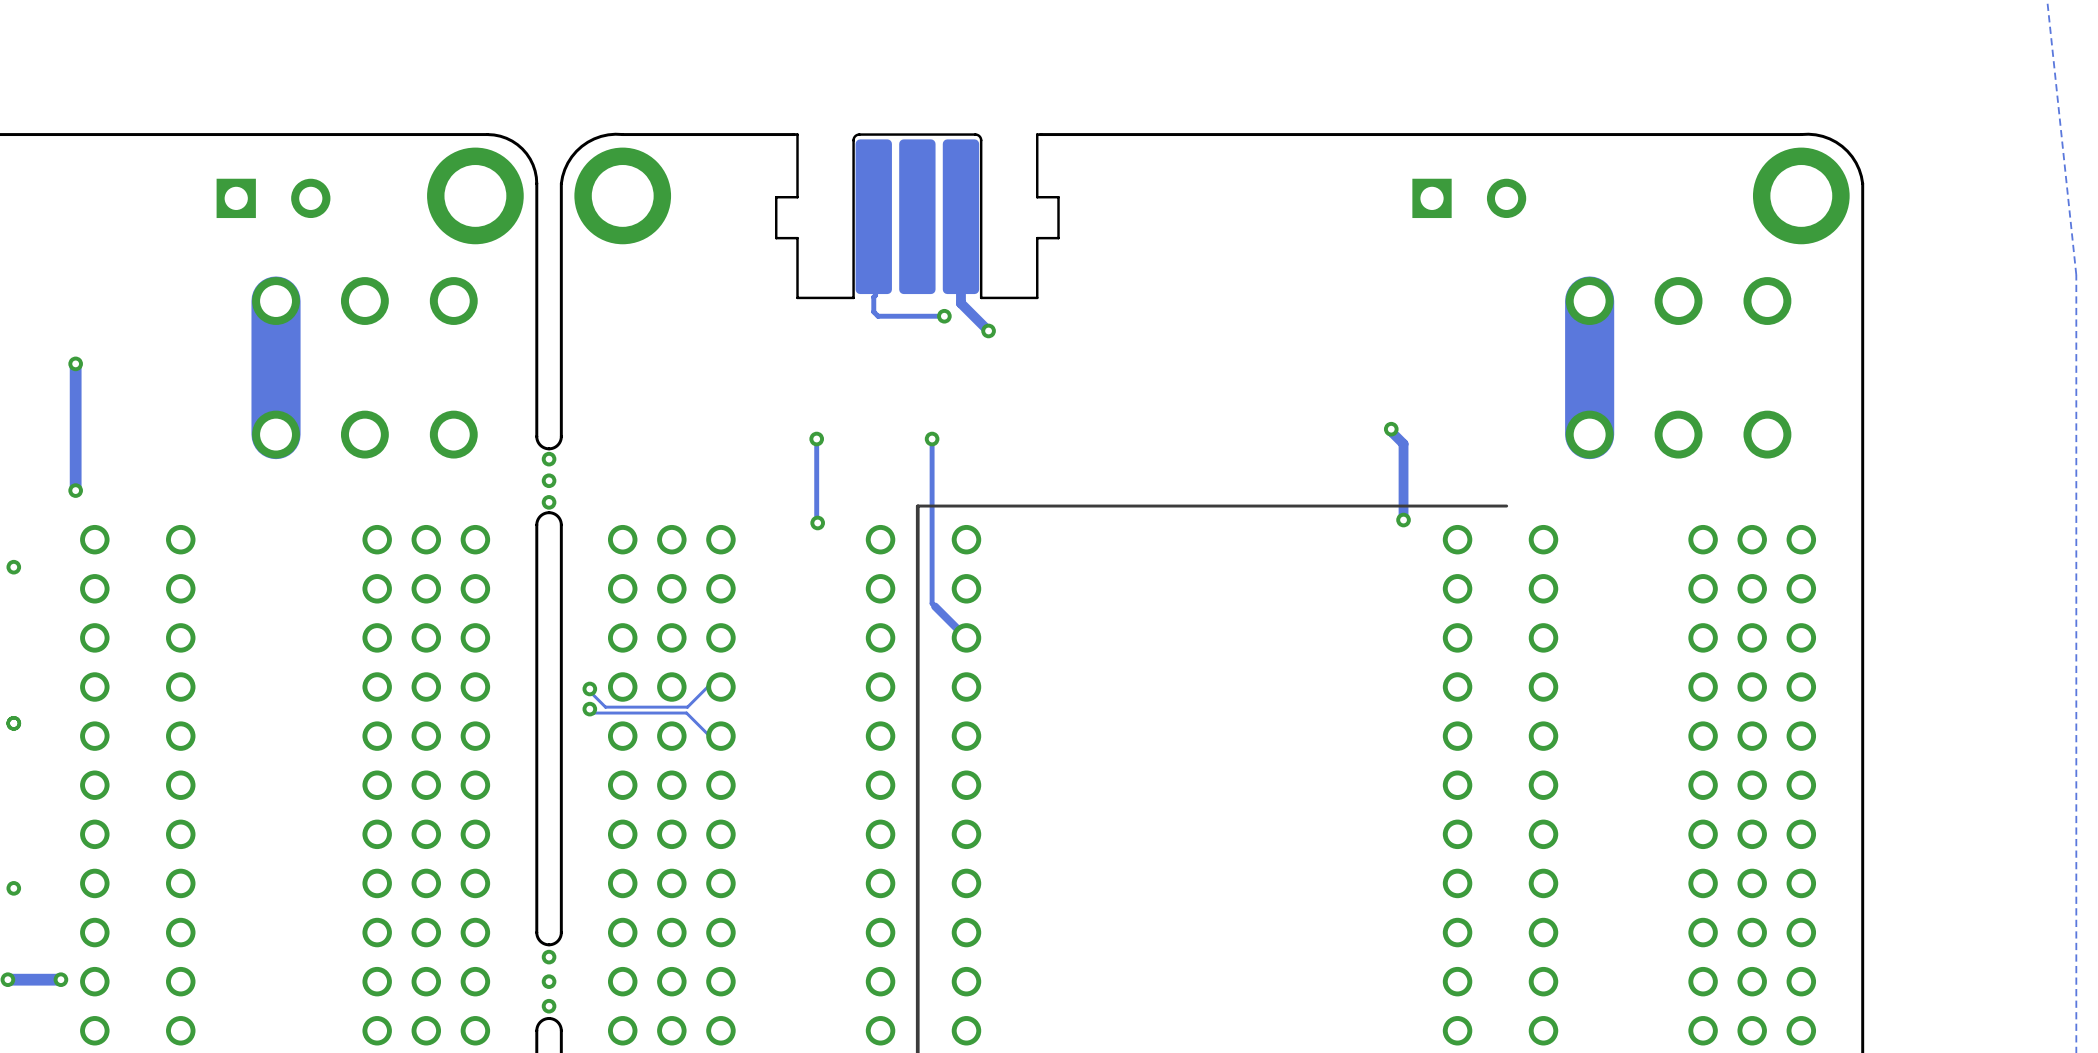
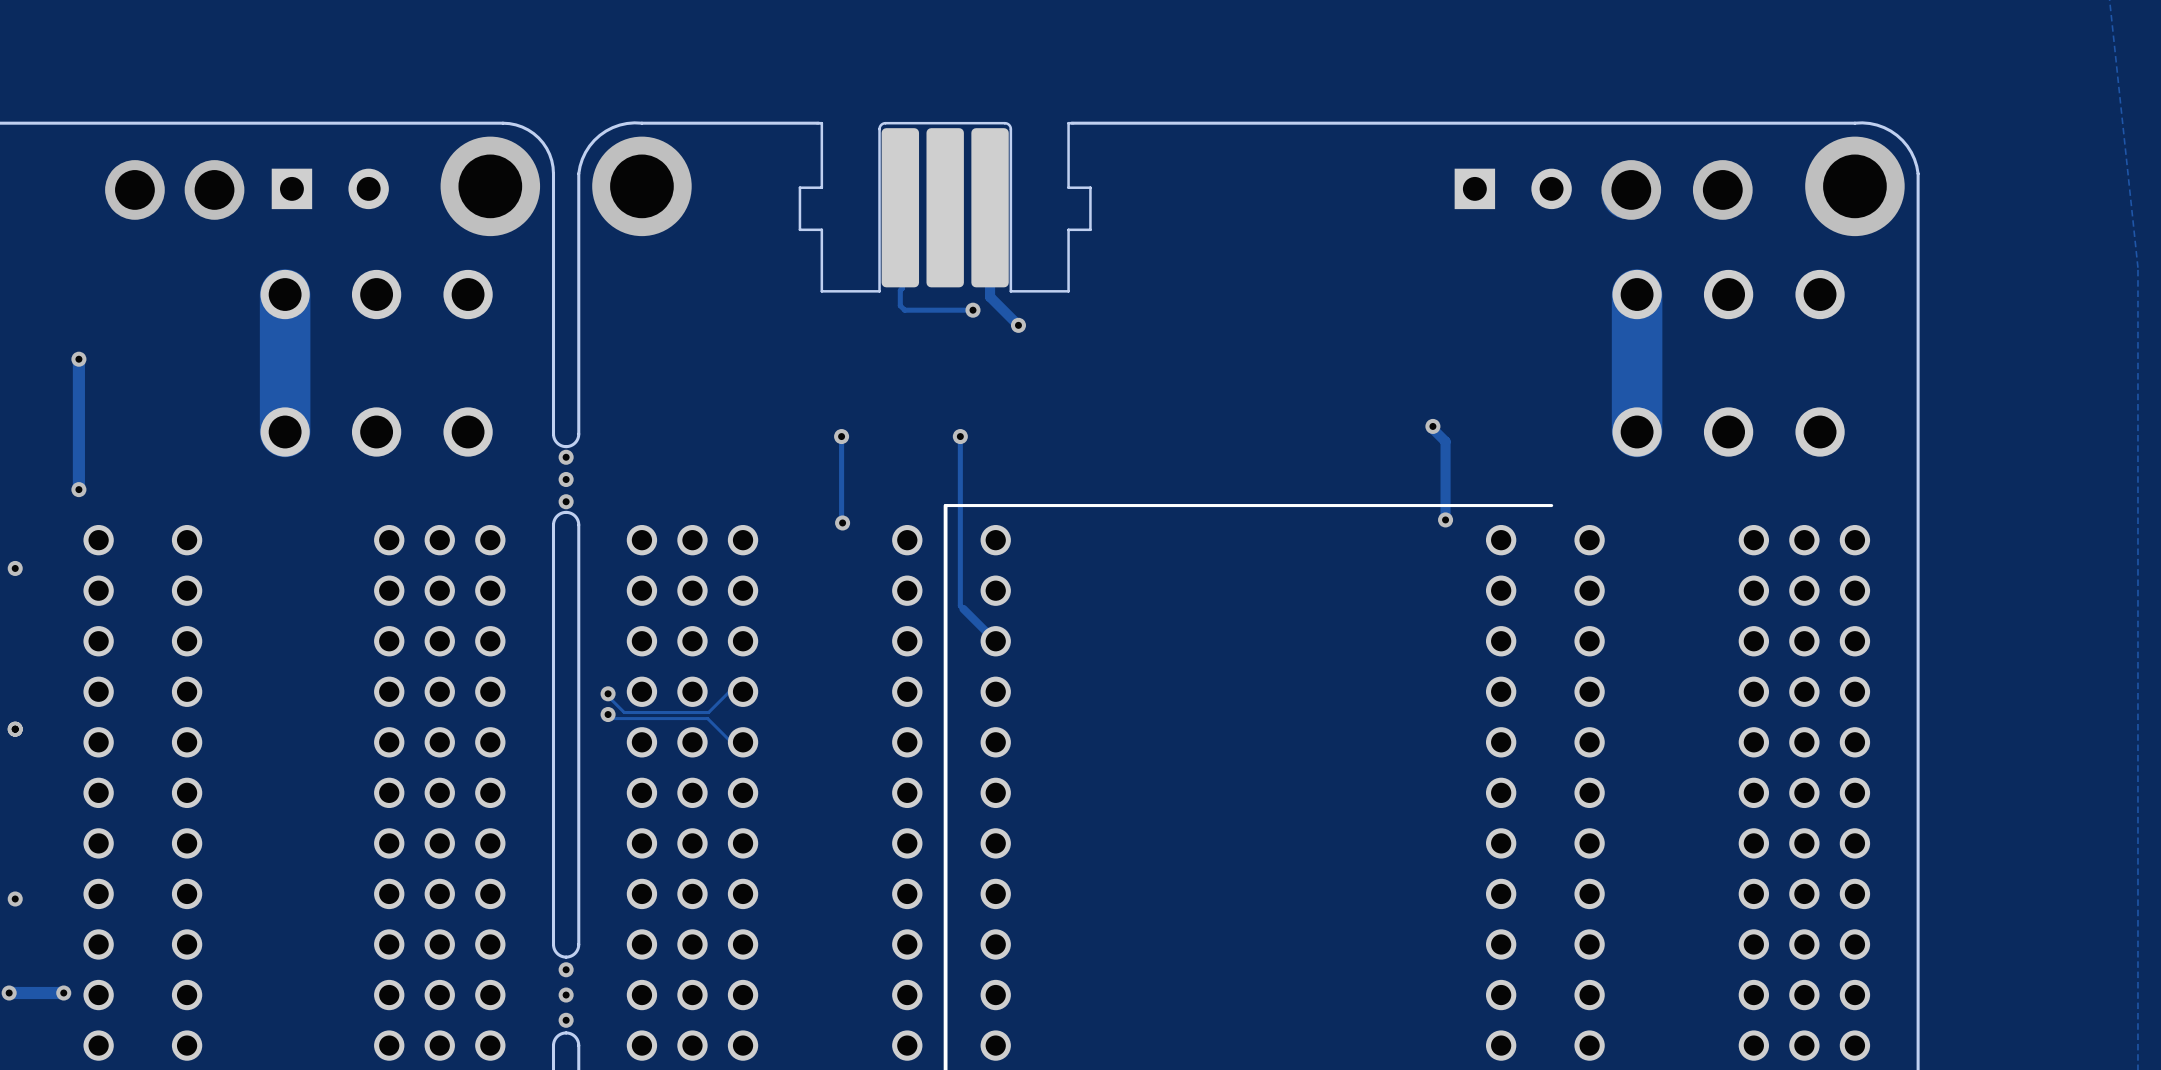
part position: (273, 198) -> (330, 188)
via: none -> (134, 189)
via: none -> (214, 189)
via: none -> (1631, 189)
via: none -> (1722, 189)

